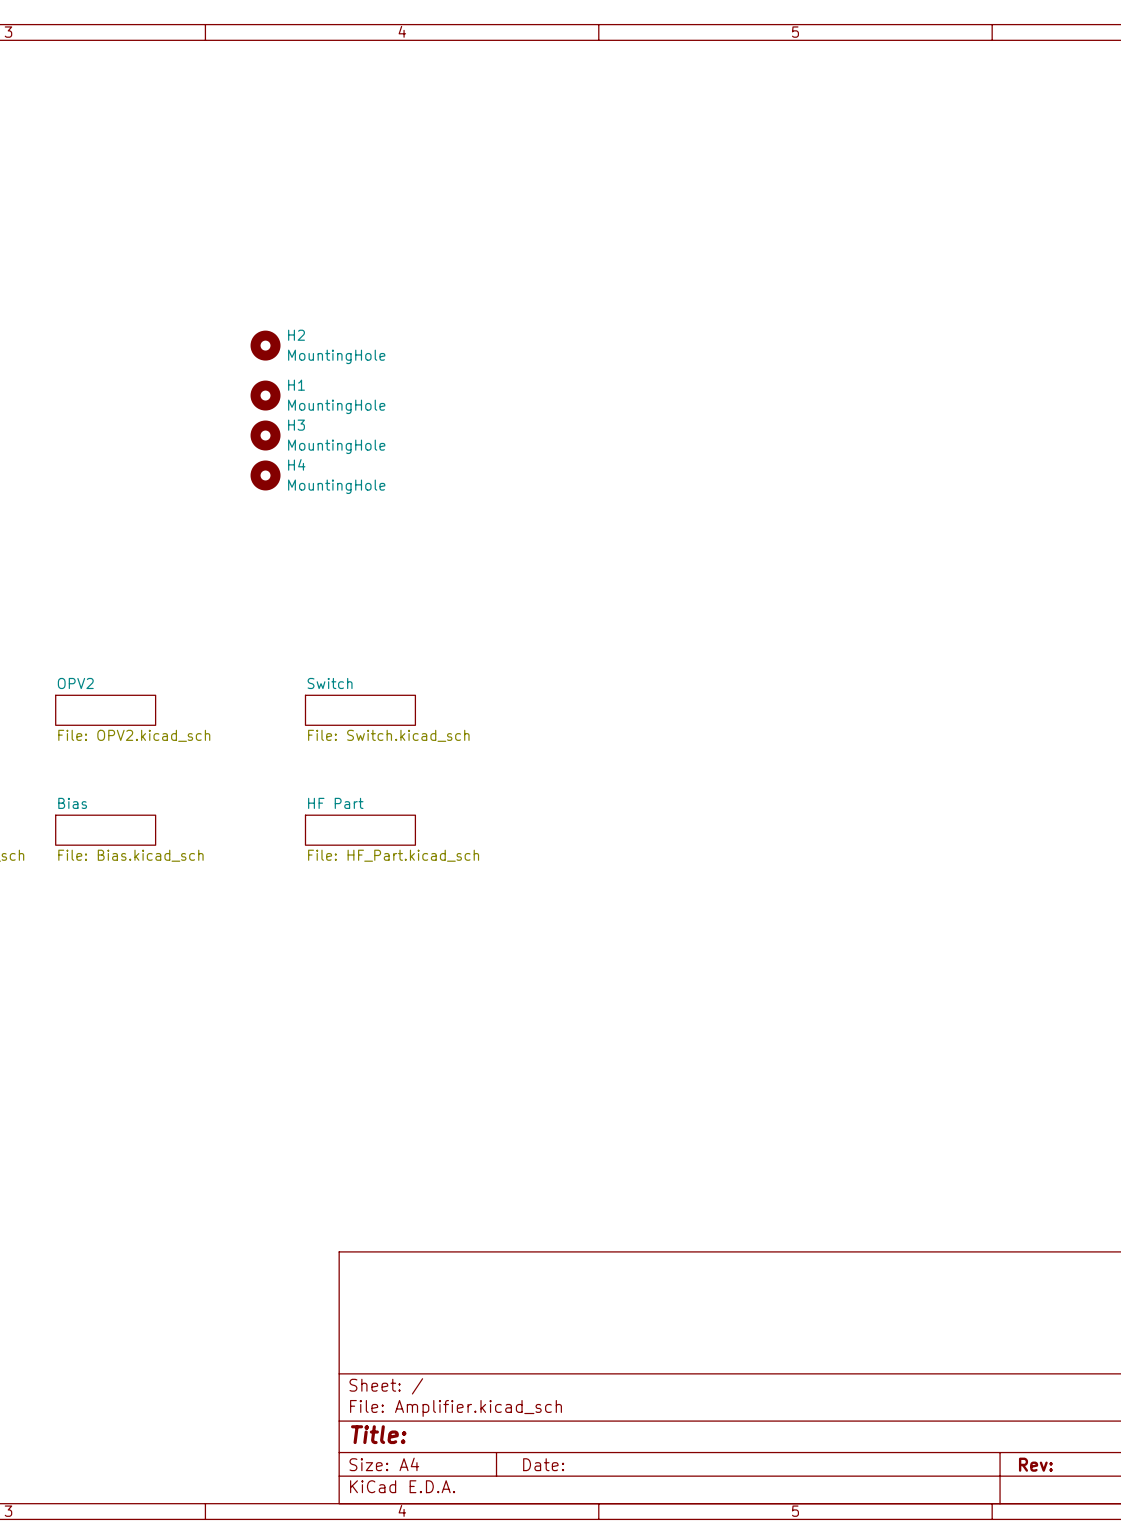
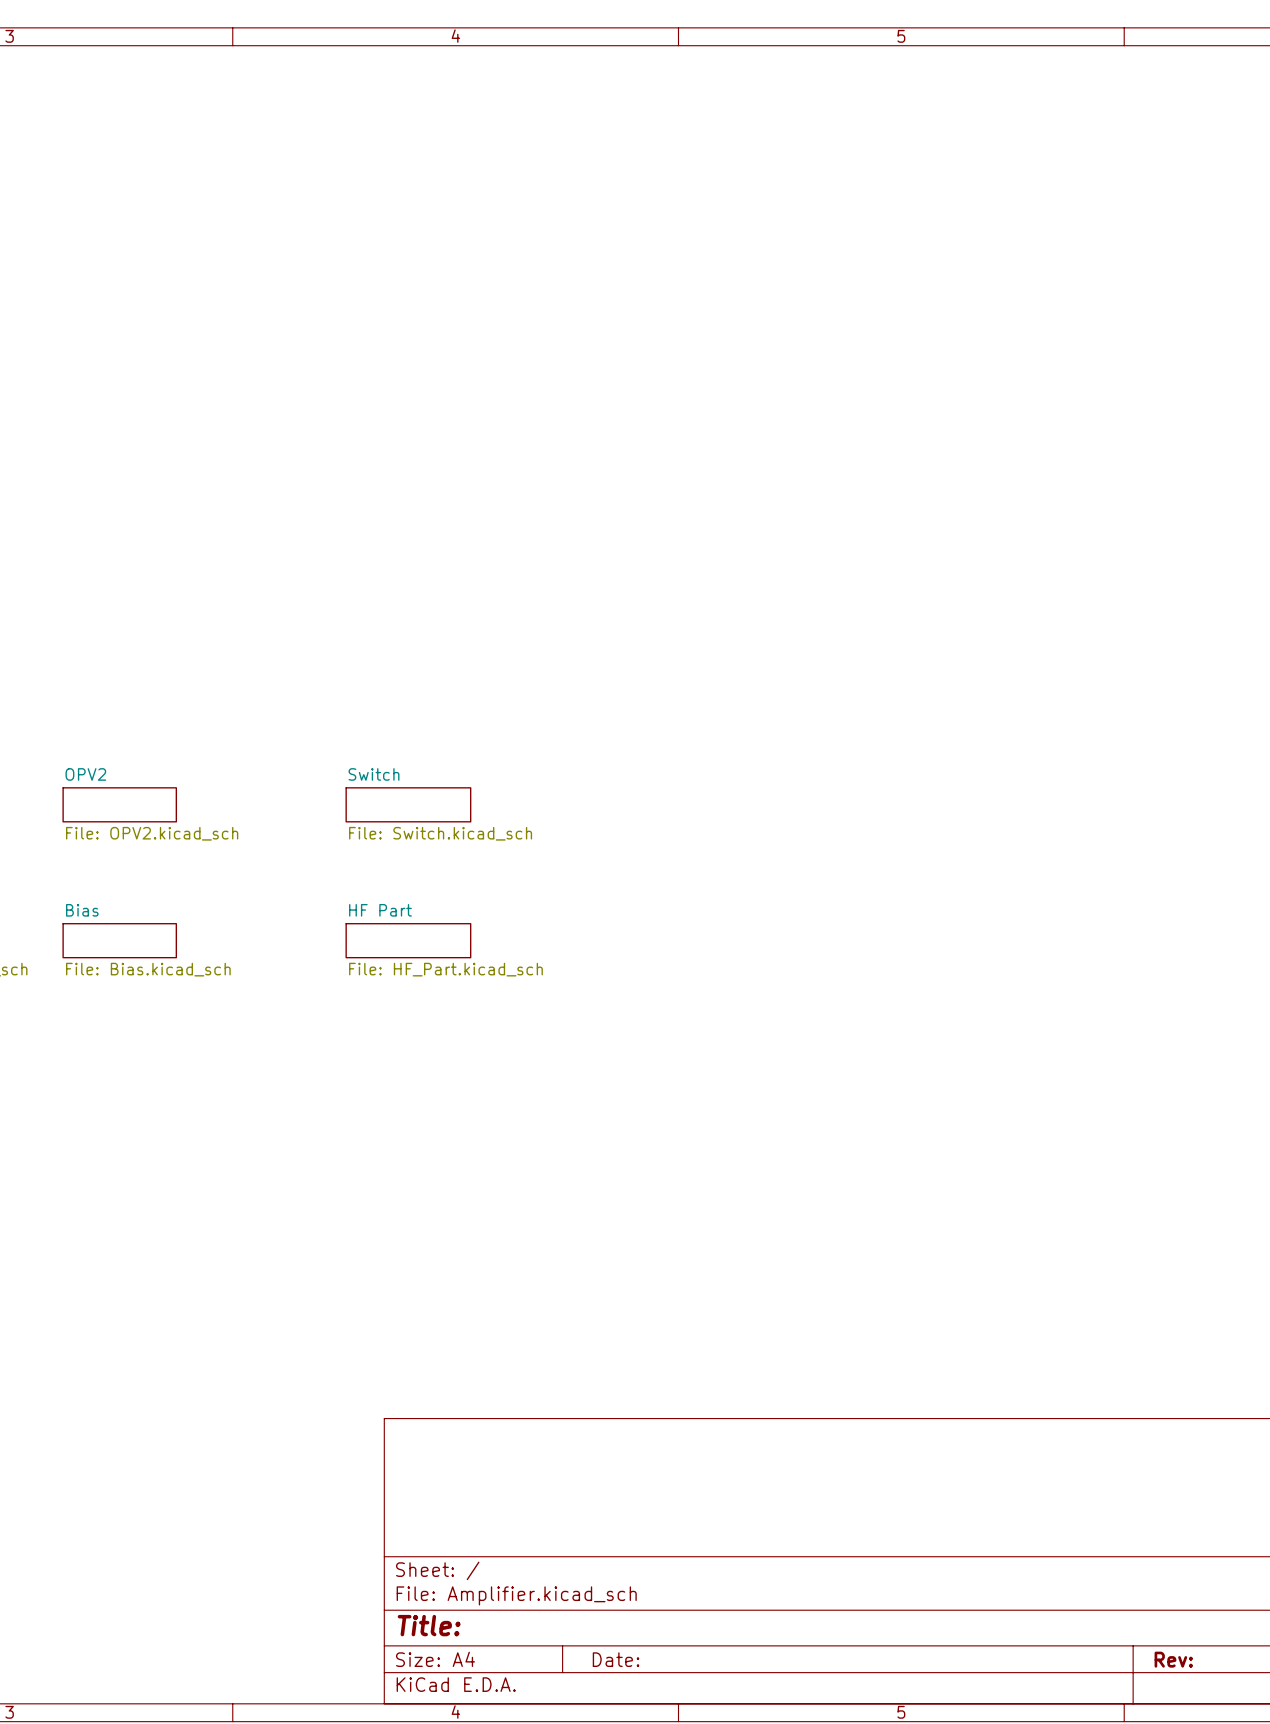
H2: MountingHole (265, 345) -> none
H1: MountingHole (265, 395) -> none
H3: MountingHole (265, 435) -> none
H4: MountingHole (265, 475) -> none

